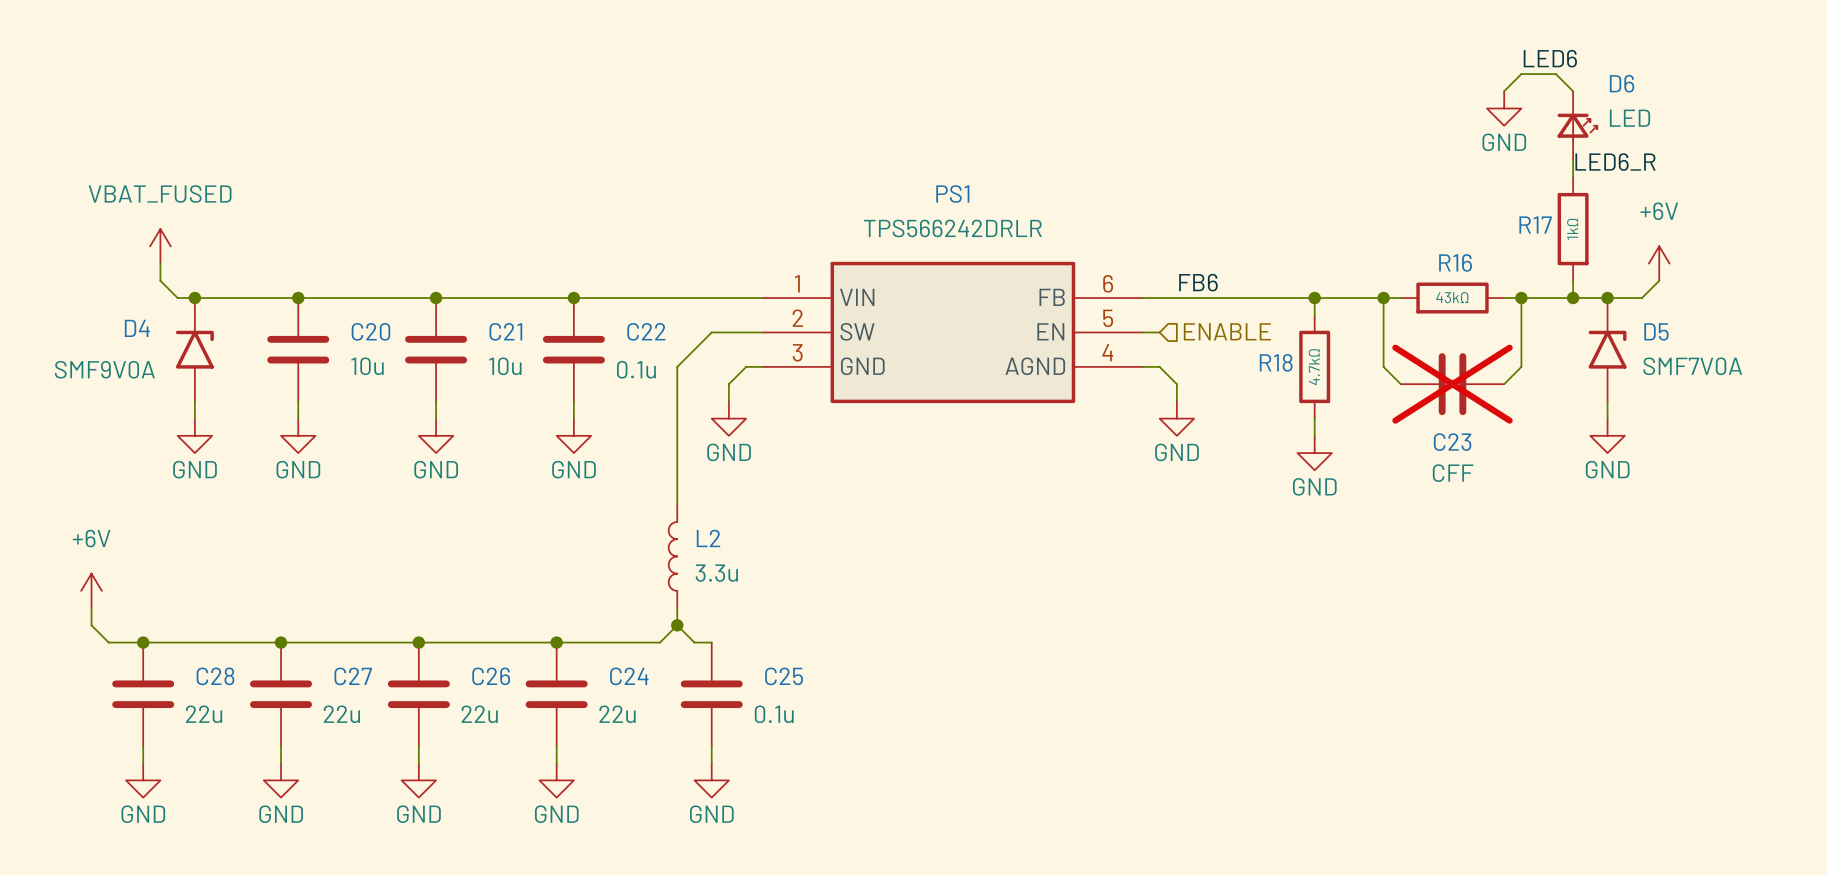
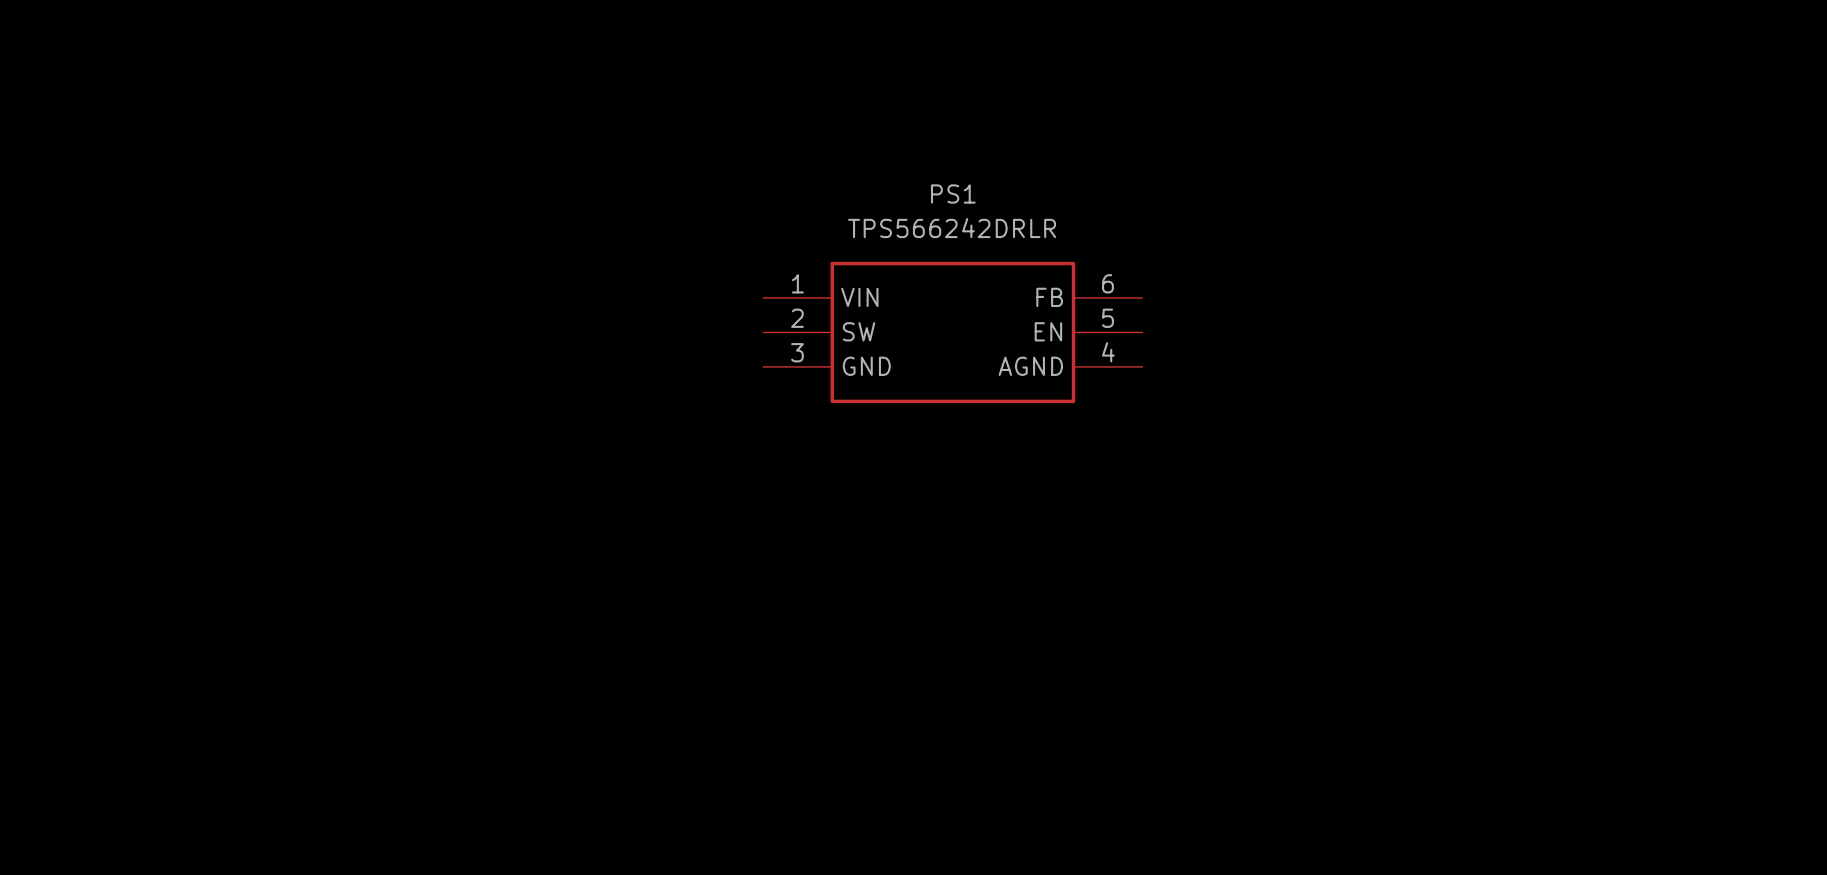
label: LED6 (1550, 58) -> none
wire: (1504, 91) (1521, 74) (1555, 74) (1573, 91) -> none
power symbol: GND (1504, 108) -> none
D6: LED (1577, 125) -> none
wire: (1573, 160) (1573, 177) -> none
label: LED6_R (1615, 162) -> none
R17: 1kΩ (1573, 229) -> none
power symbol: VBAT_FUSED (160, 246) -> none
wire: (160, 263) (160, 280) (177, 298) (763, 298) -> none
power symbol: +6V (1659, 263) -> none
wire: (1573, 280) (1573, 298) -> none
wire: (1659, 280) (1642, 298) (1504, 298) -> none
label: FB6 (1198, 282) -> none
junction: (194, 298) -> none
junction: (298, 298) -> none
junction: (436, 298) -> none
junction: (573, 298) -> none
wire: (1142, 298) (1400, 298) -> none
wire: (1314, 298) (1314, 315) -> none
junction: (1314, 298) -> none
wire: (1383, 298) (1383, 366) (1400, 384) -> none
junction: (1383, 298) -> none
R16: 43kΩ (1452, 298) -> none
wire: (1521, 298) (1521, 366) (1504, 384) -> none
junction: (1521, 298) -> none
junction: (1573, 298) -> none
junction: (1607, 298) -> none
hierarchical label: ENABLE (1227, 331) -> none
wire: (763, 332) (711, 332) (677, 366) (677, 504) -> none
wire: (1142, 332) (1159, 332) -> none
D4: SMF9V0A (194, 349) -> none
C20: 10u (298, 349) -> none
C21: 10u (436, 349) -> none
C22: 0.1u (573, 349) -> none
D5: SMF7V0A (1607, 349) -> none
wire: (763, 366) (746, 366) (728, 384) (728, 401) -> none
wire: (1142, 366) (1159, 366) (1176, 384) (1176, 401) -> none
R18: 4.7kΩ (1314, 366) -> none
C23: CFF (1452, 384) -> none
wire: (194, 401) (194, 418) -> none
wire: (298, 401) (298, 418) -> none
wire: (436, 401) (436, 418) -> none
wire: (573, 401) (573, 418) -> none
wire: (1607, 401) (1607, 418) -> none
power symbol: GND (728, 418) -> none
power symbol: GND (1176, 418) -> none
wire: (1314, 418) (1314, 435) -> none
power symbol: GND (194, 435) -> none
power symbol: GND (298, 435) -> none
power symbol: GND (436, 435) -> none
power symbol: GND (573, 435) -> none
power symbol: GND (1607, 435) -> none
power symbol: GND (1314, 453) -> none
L2: 3.3u (672, 556) -> none
power symbol: +6V (91, 590) -> none
wire: (91, 608) (91, 625) (108, 642) (660, 642) (677, 625) -> none
wire: (677, 608) (677, 625) -> none
wire: (677, 625) (694, 642) (711, 642) -> none
junction: (677, 625) -> none
junction: (143, 642) -> none
junction: (281, 642) -> none
junction: (418, 642) -> none
junction: (556, 642) -> none
C28: 22u (143, 694) -> none
C27: 22u (281, 694) -> none
C26: 22u (418, 694) -> none
C24: 22u (556, 694) -> none
C25: 0.1u (711, 694) -> none
wire: (143, 745) (143, 763) -> none
wire: (281, 745) (281, 763) -> none
wire: (418, 745) (418, 763) -> none
wire: (556, 745) (556, 763) -> none
wire: (711, 745) (711, 763) -> none
power symbol: GND (143, 780) -> none
power symbol: GND (281, 780) -> none
power symbol: GND (418, 780) -> none
power symbol: GND (556, 780) -> none
power symbol: GND (711, 780) -> none

